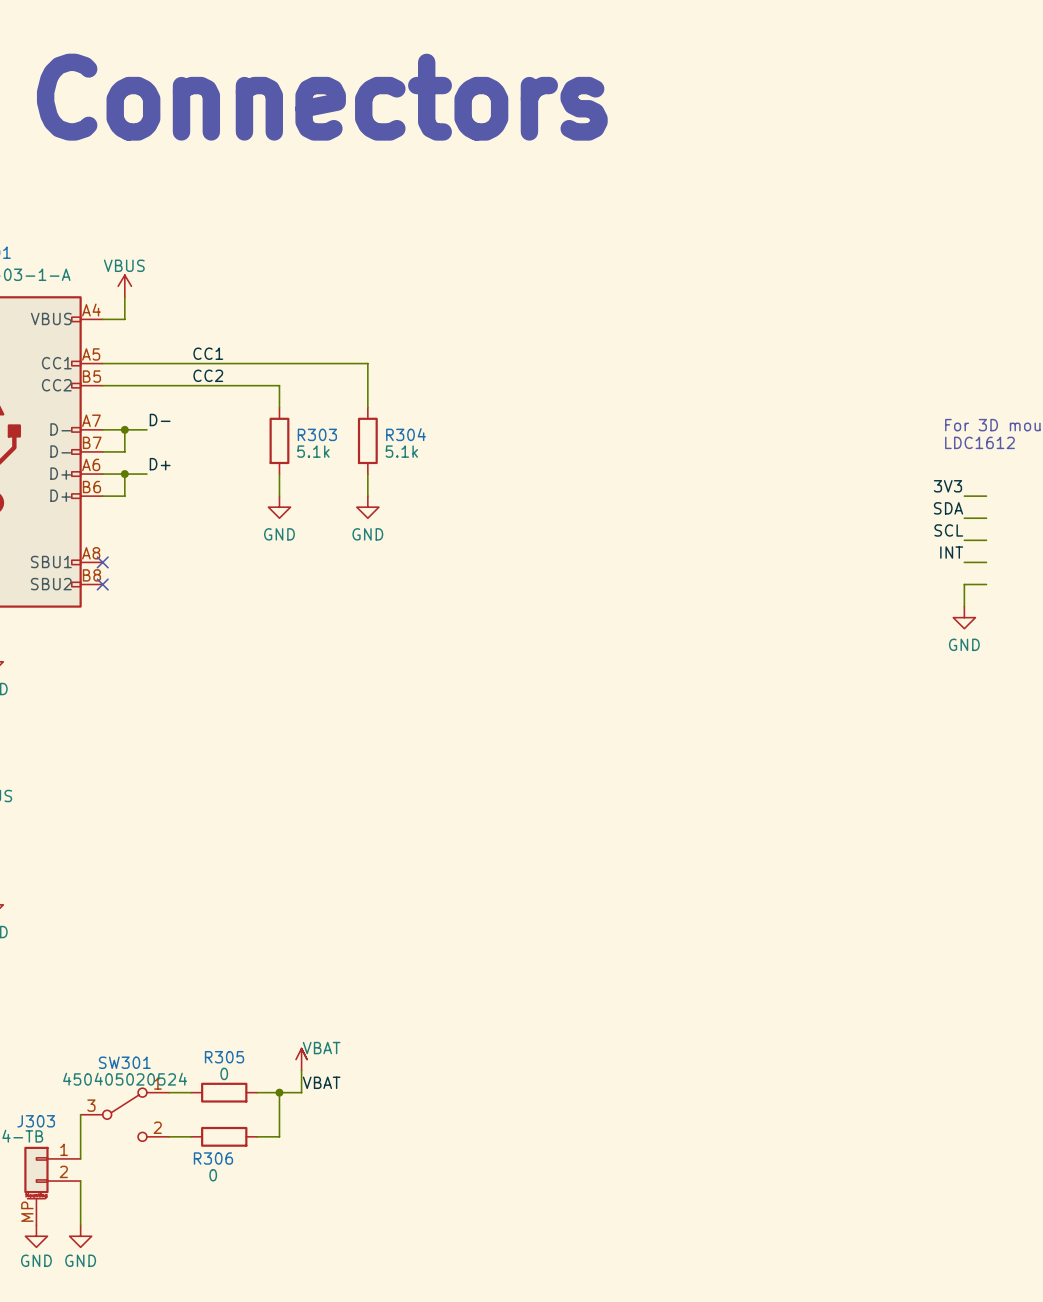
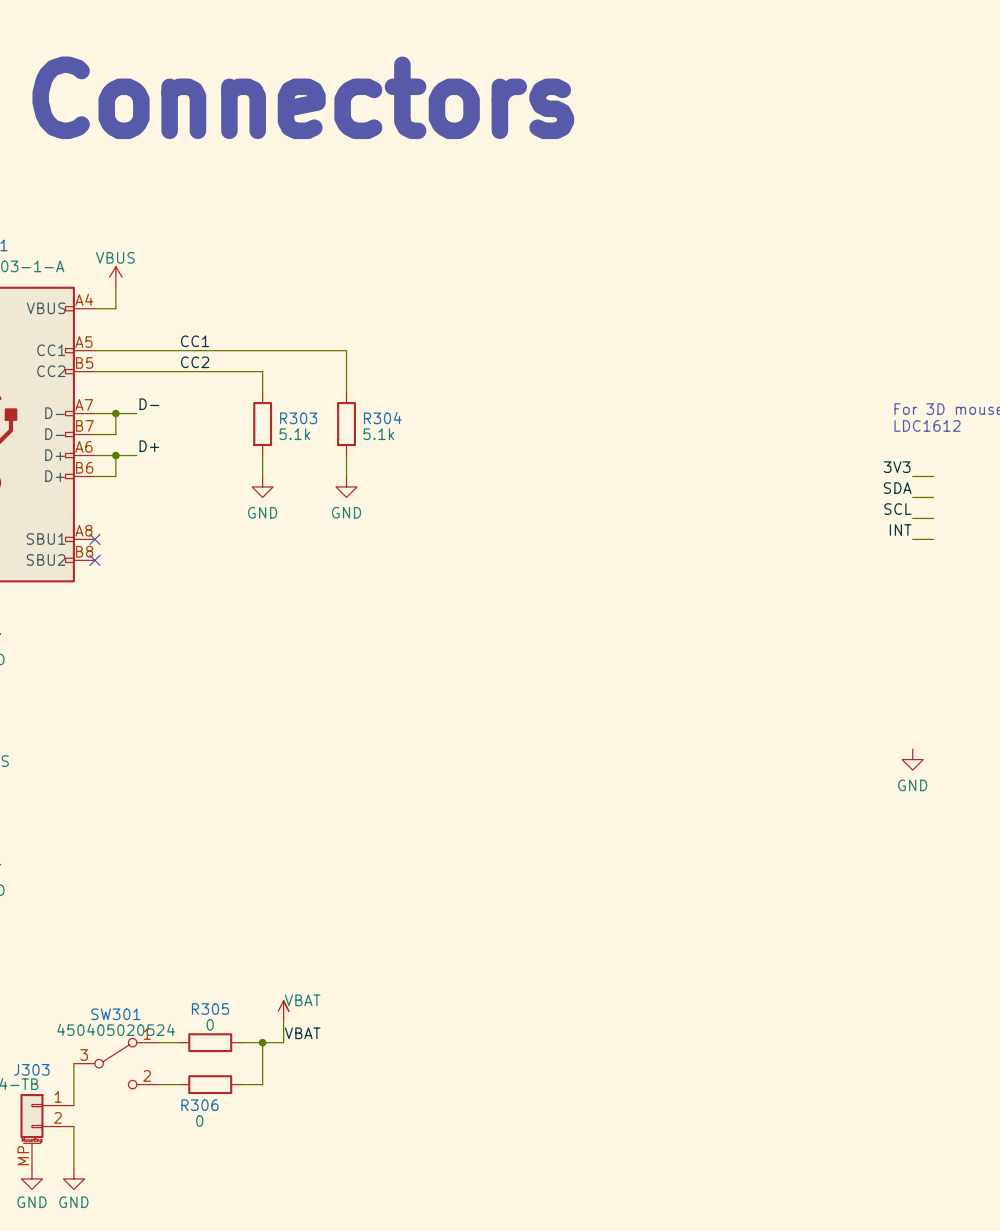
wire: (986, 584) (964, 584) (964, 606) -> none
power symbol position: GND (964, 617) -> GND (912, 759)

